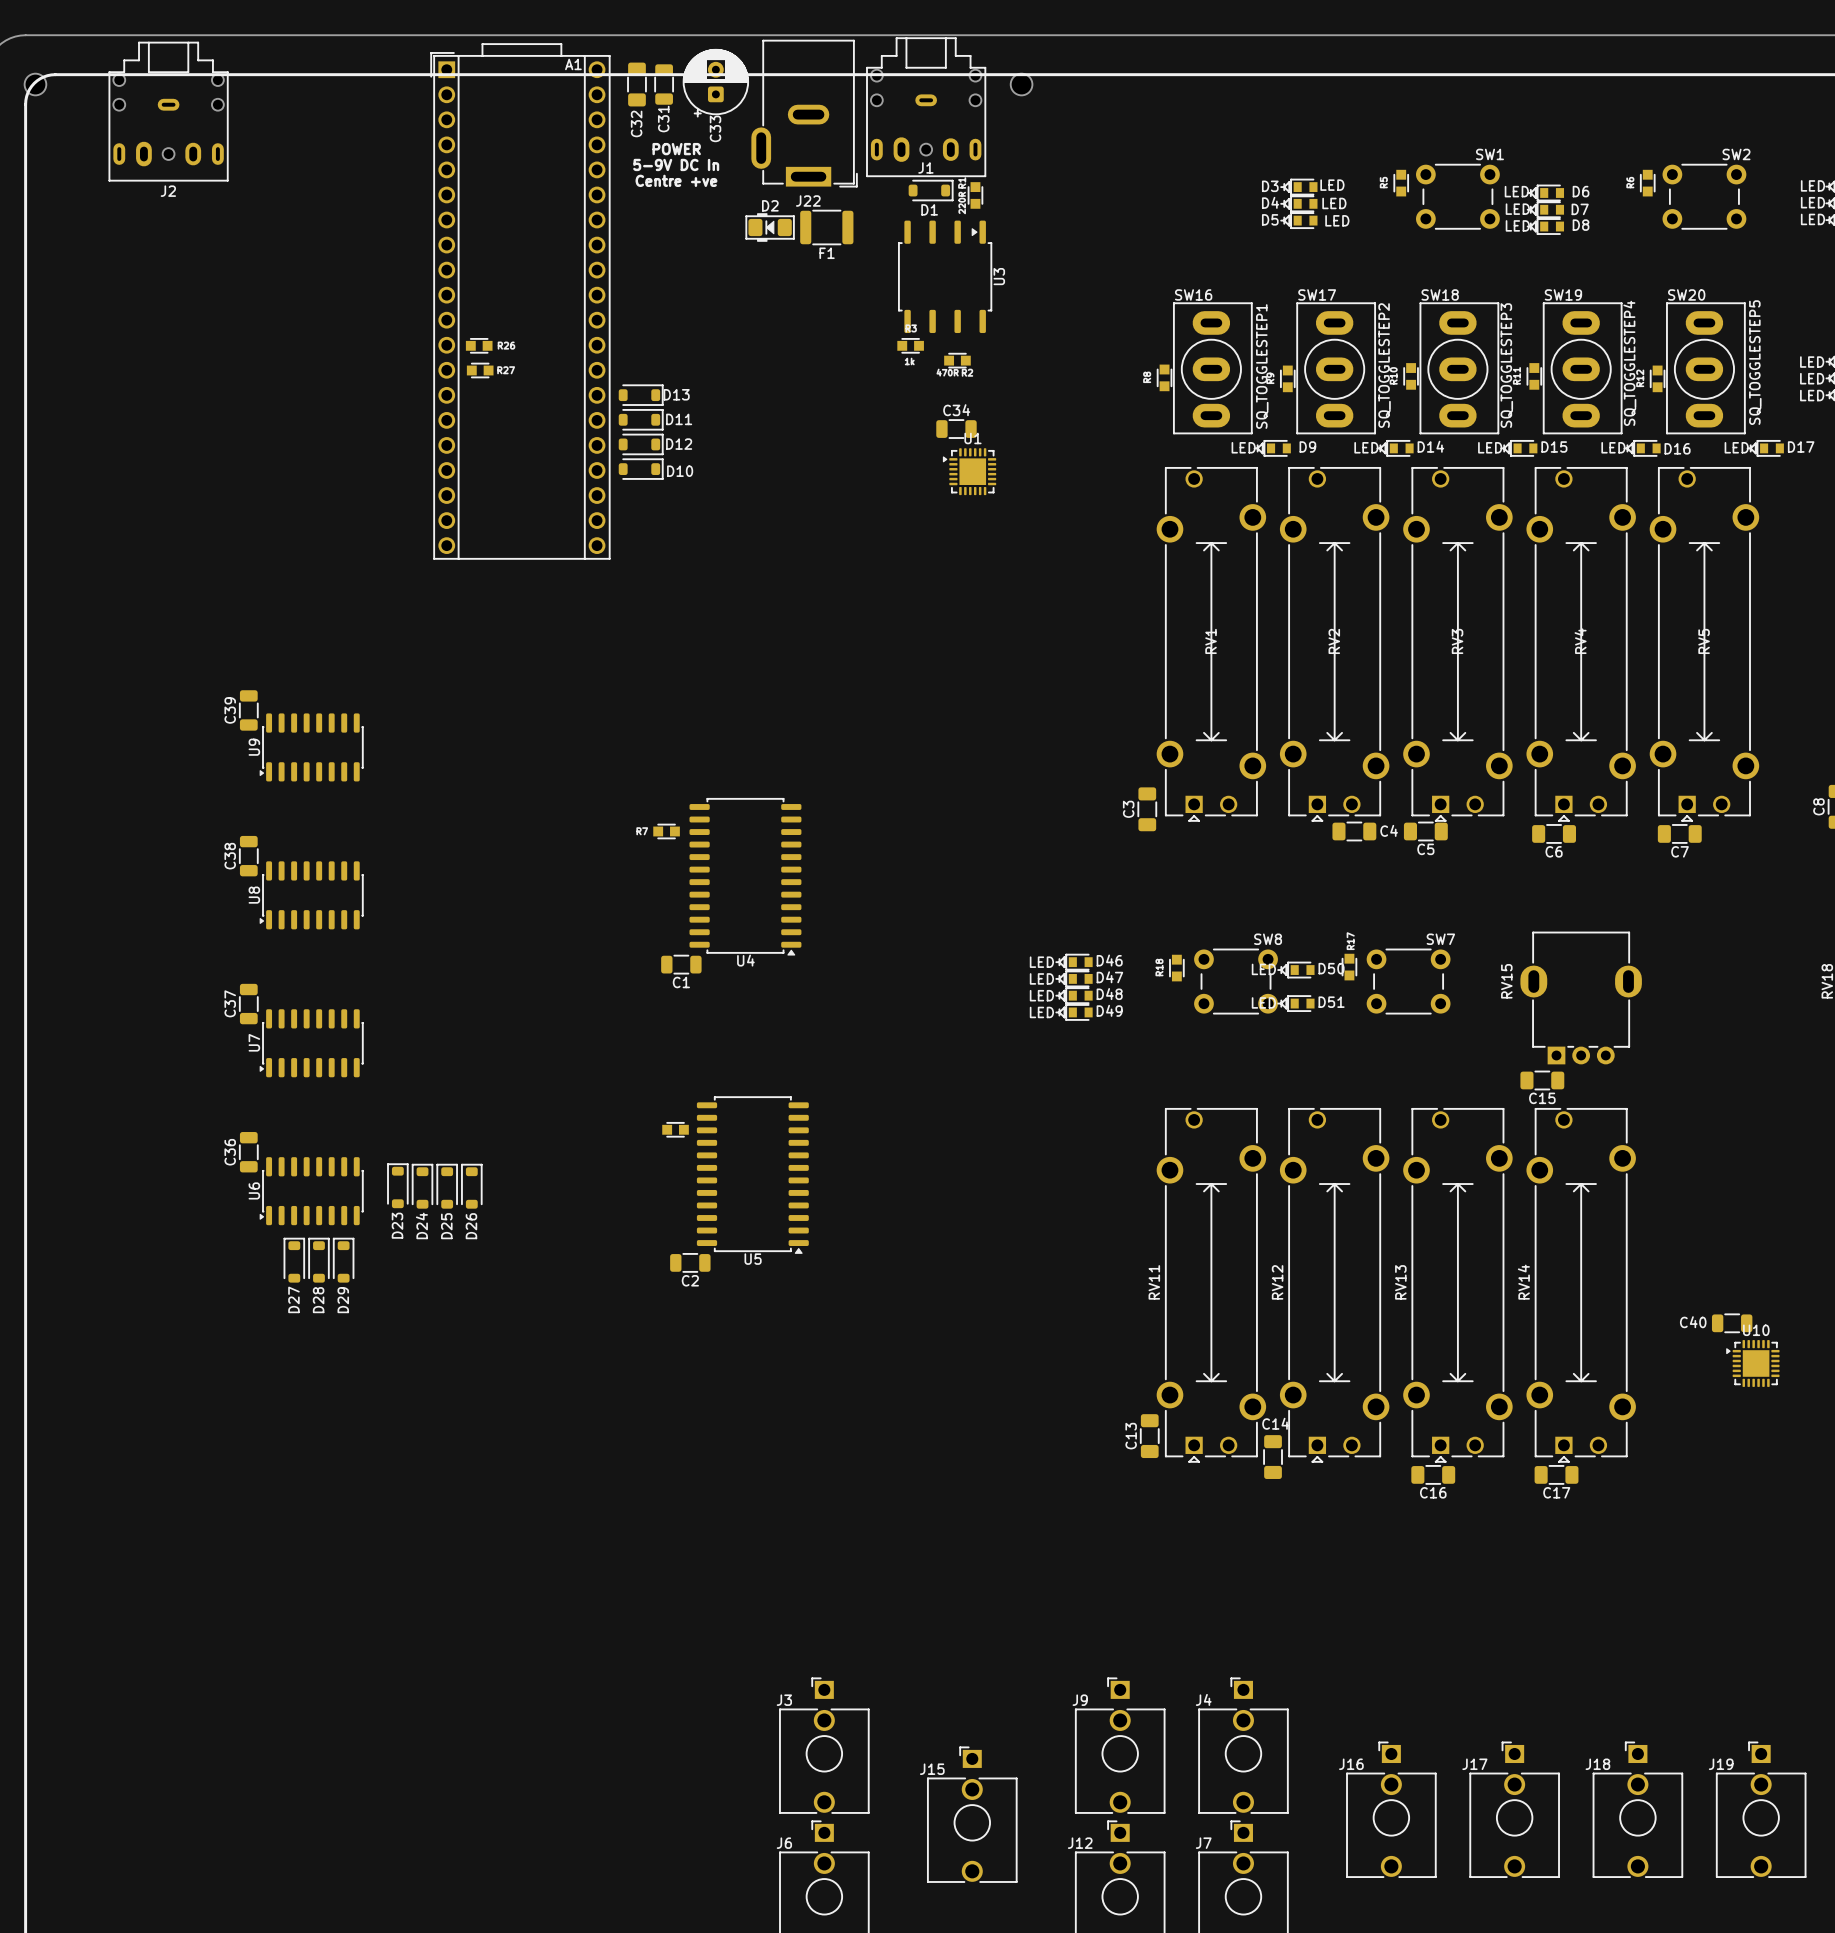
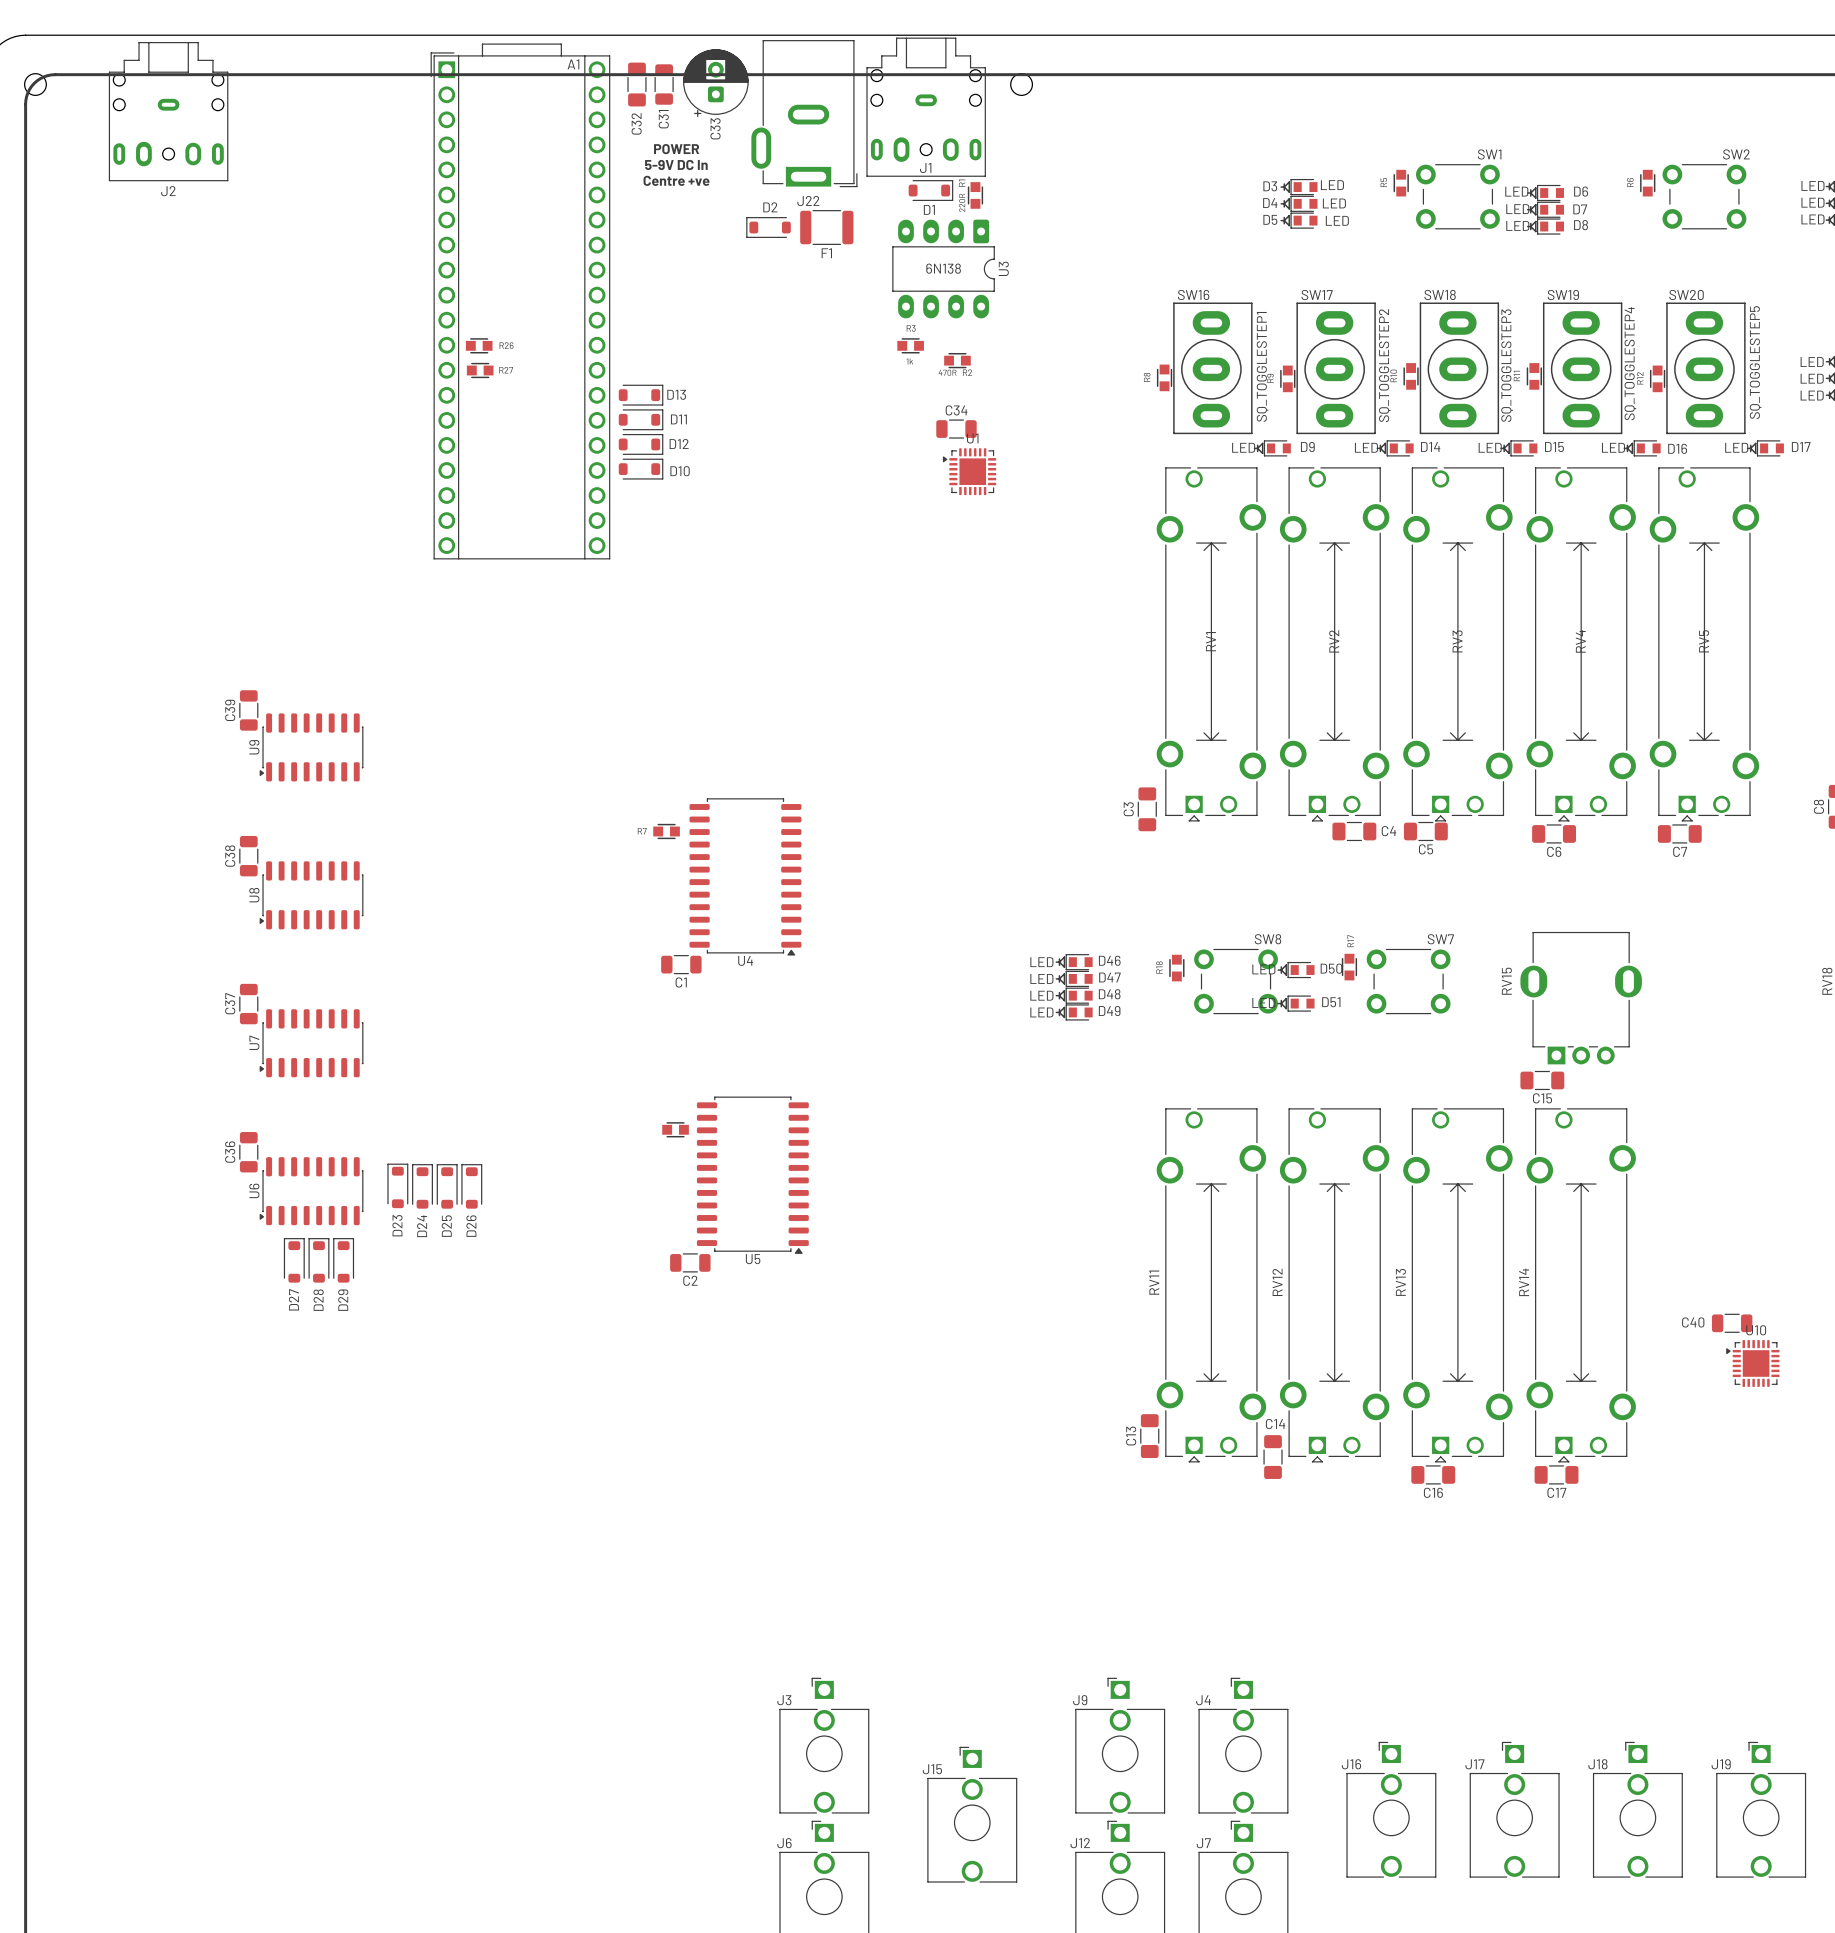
D2 footprint: [745, 213, 795, 242] -> [746, 217, 791, 238]
U3 footprint: [898, 220, 992, 334] -> [892, 219, 995, 319]
U3 value: none -> 6N138 (943, 268)

